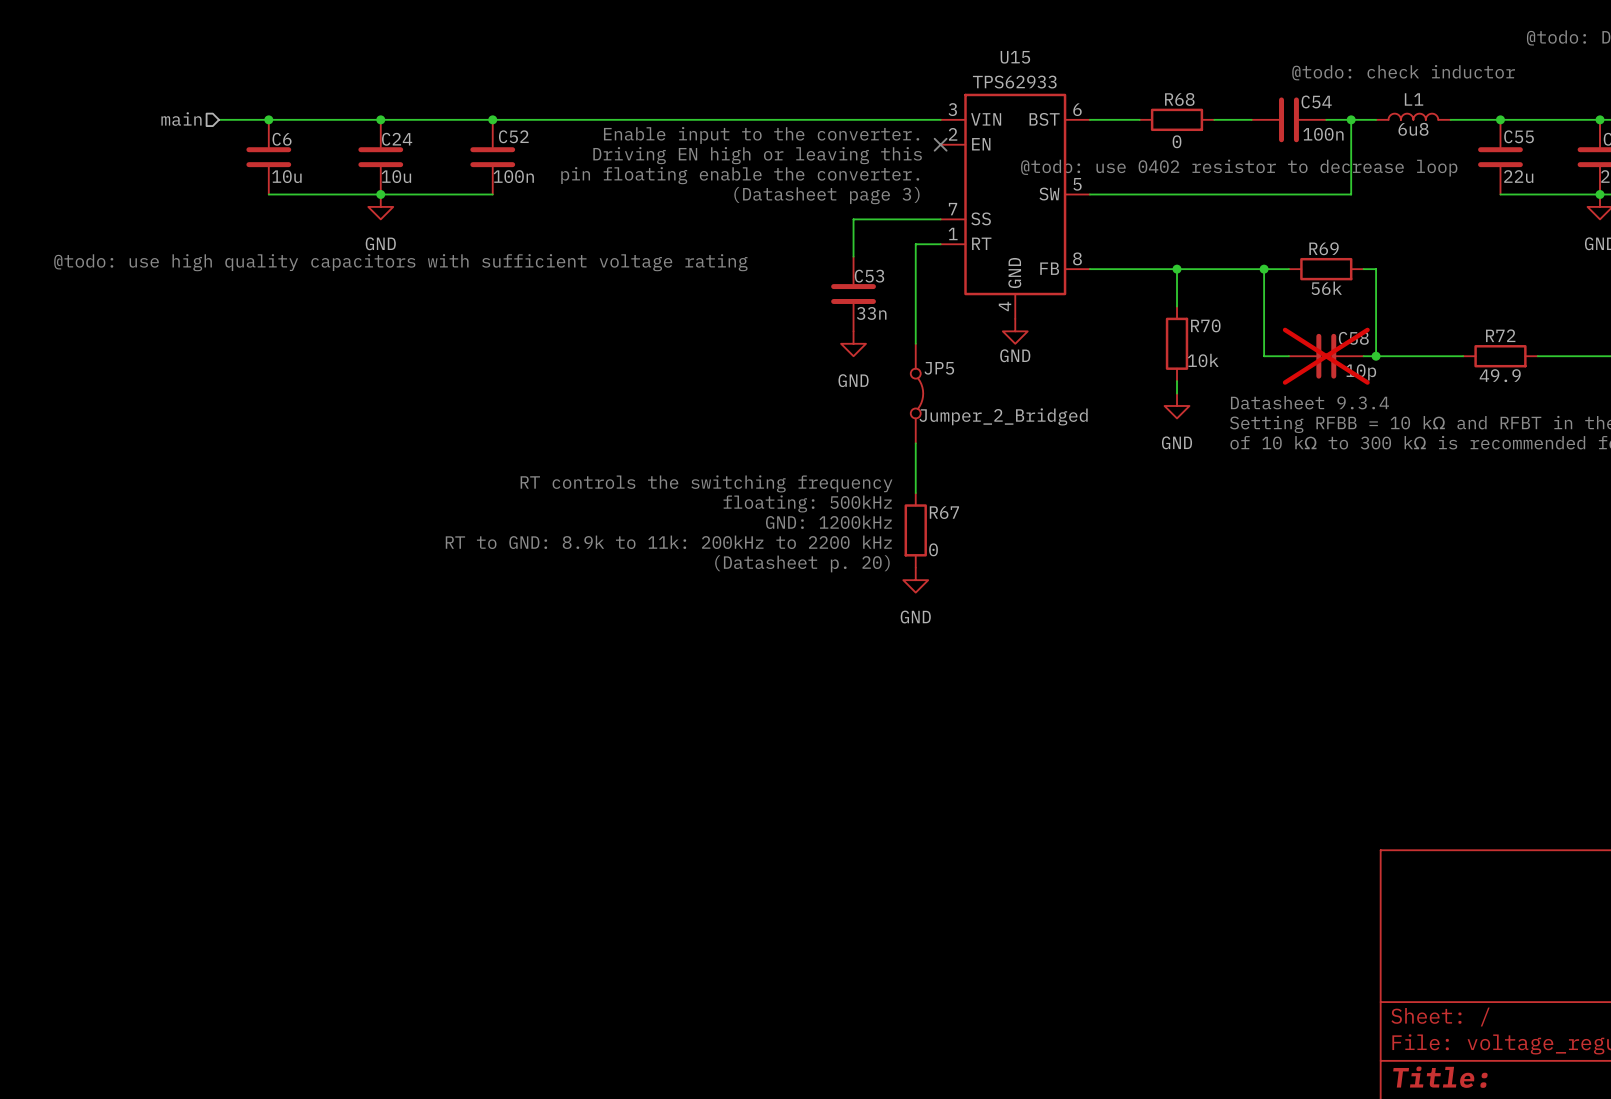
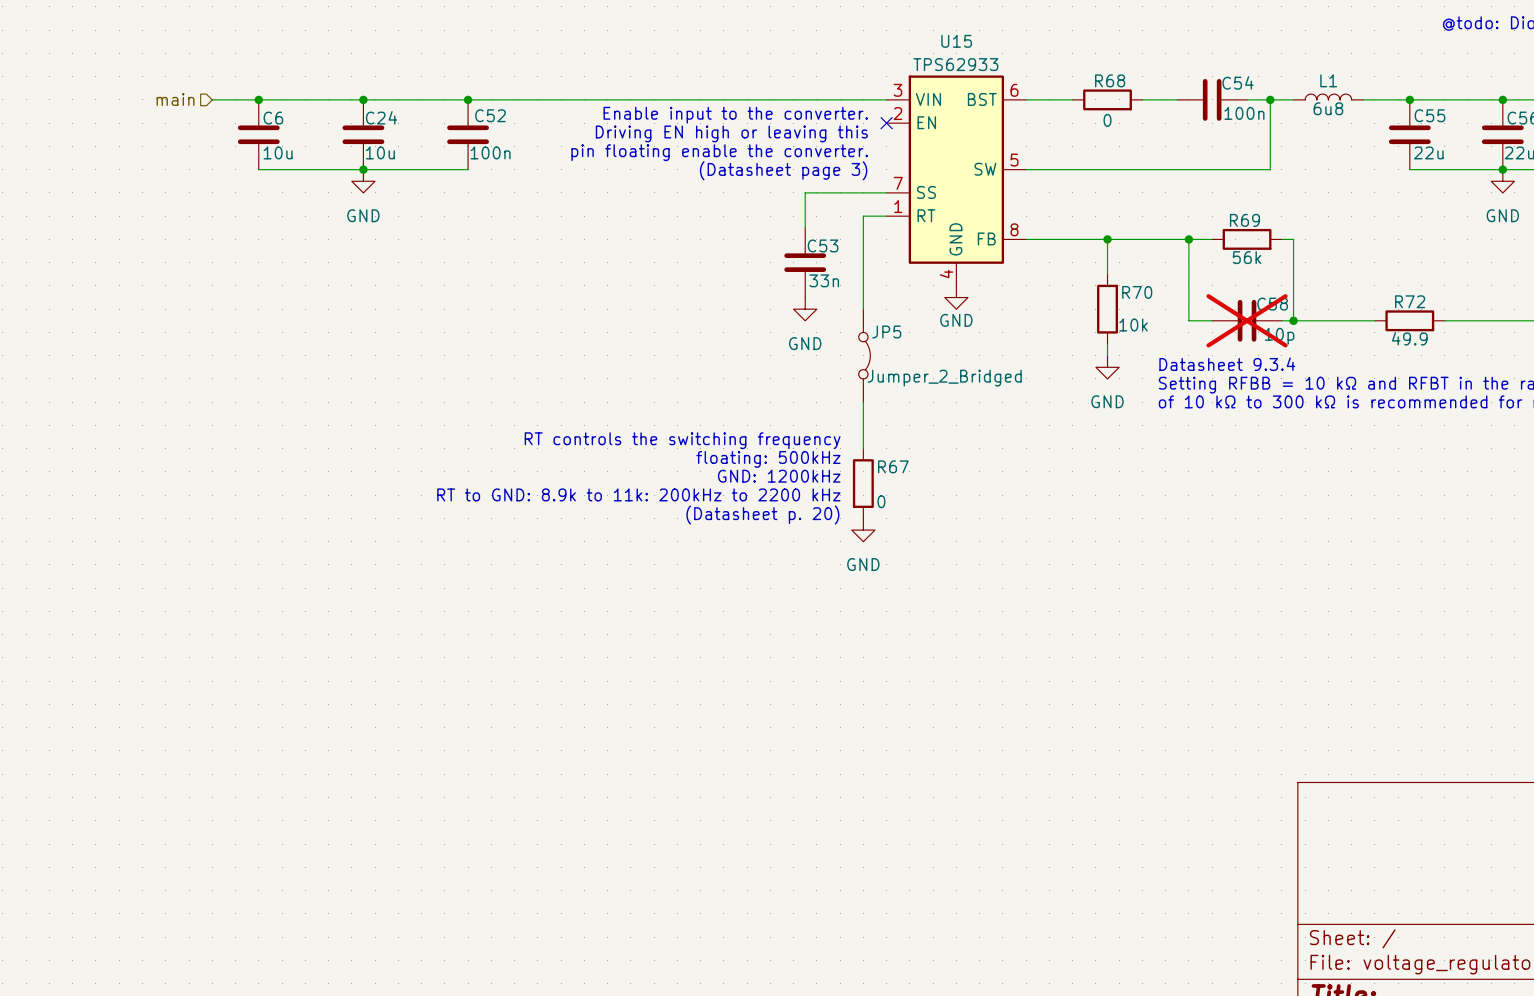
text: @todo: check inductor (1403, 72) -> none
text: @todo: use 0402 resistor to decrease loop (1239, 168) -> none
text: @todo: use high quality capacitors with sufficient voltage rating (400, 262) -> none

